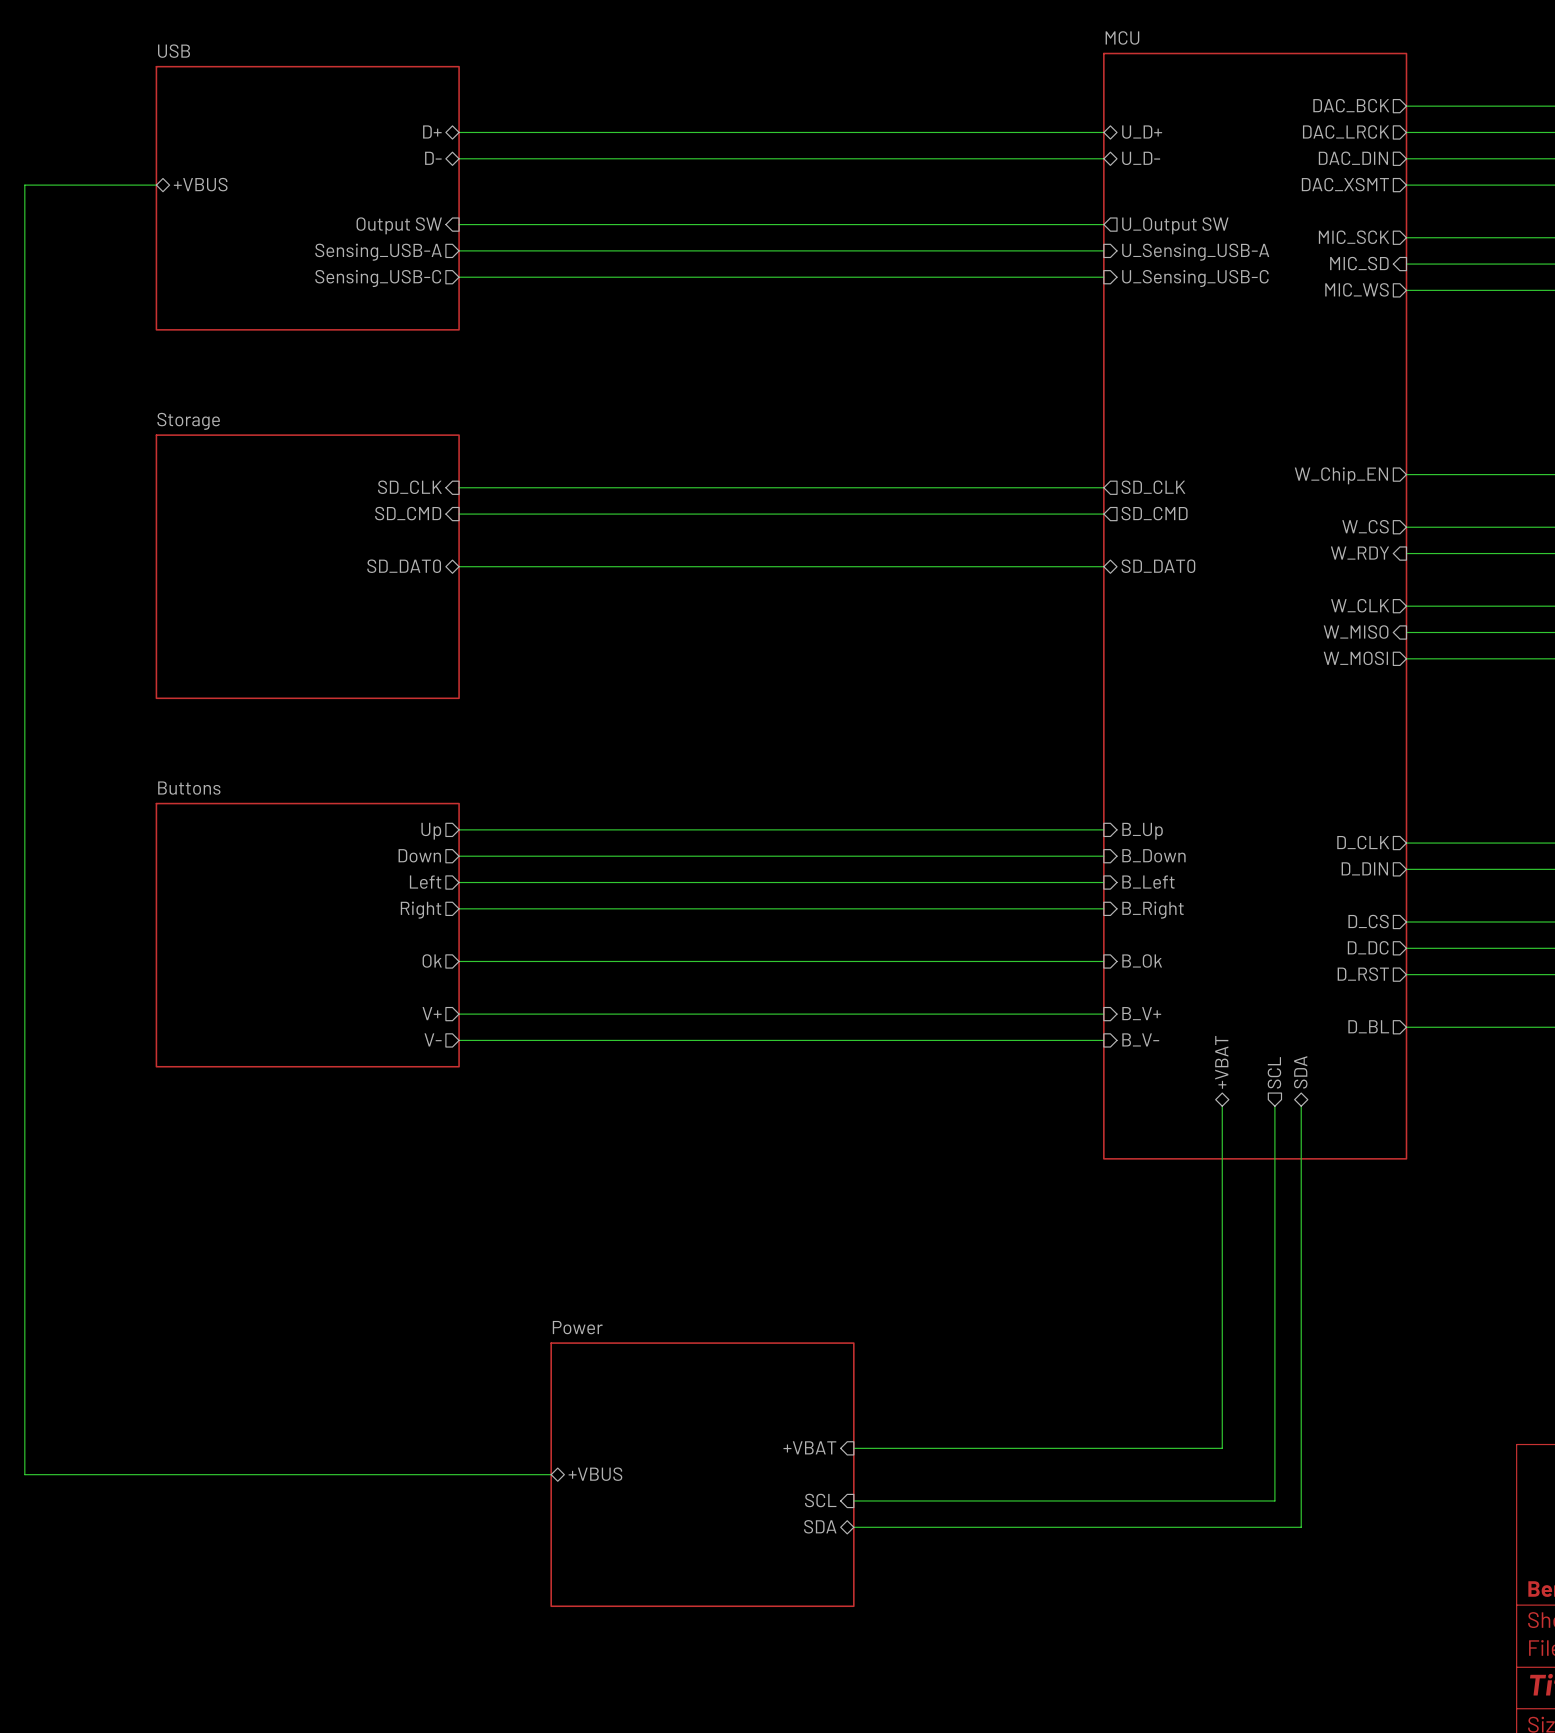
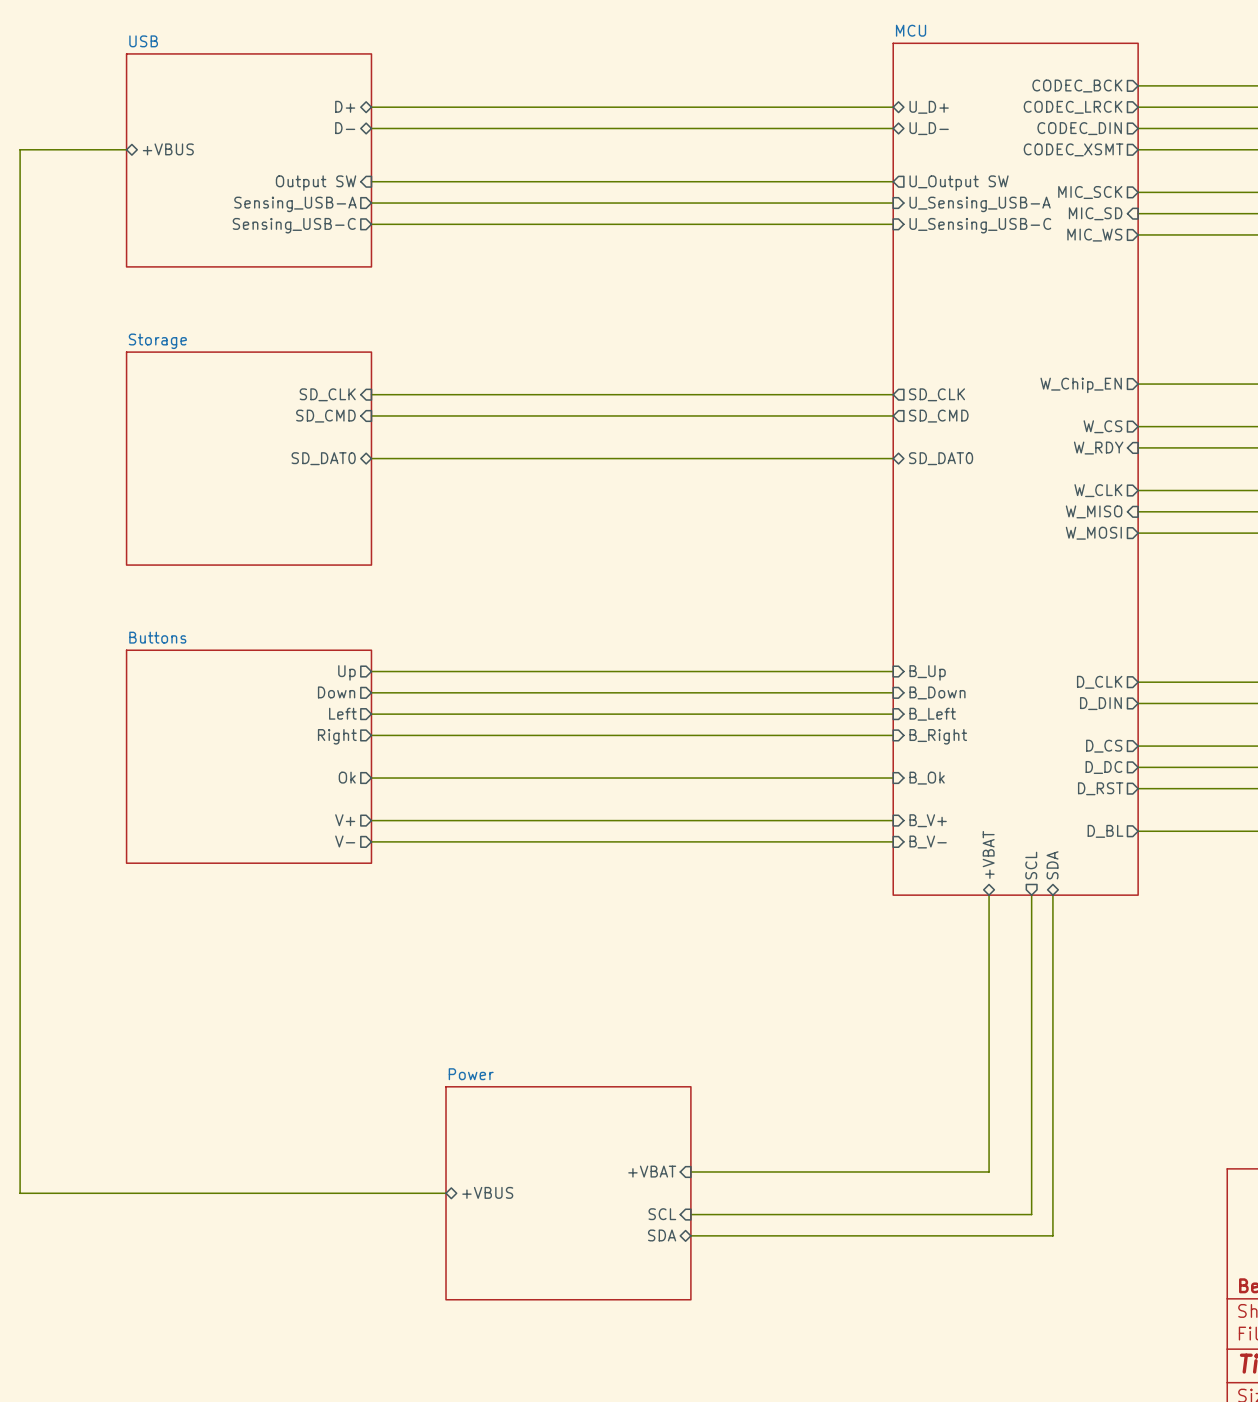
sheet pin: DAC_BCK (1351, 105) -> CODEC_BCK (1077, 86)
sheet pin: DAC_LRCK (1346, 131) -> CODEC_LRCK (1073, 107)
sheet pin: DAC_DIN (1353, 158) -> CODEC_DIN (1079, 128)
sheet pin: DAC_XSMT (1345, 184) -> CODEC_XSMT (1073, 149)
sheet MCU: none -> (1015, 469)
sheet MCU: (1255, 606) -> none

